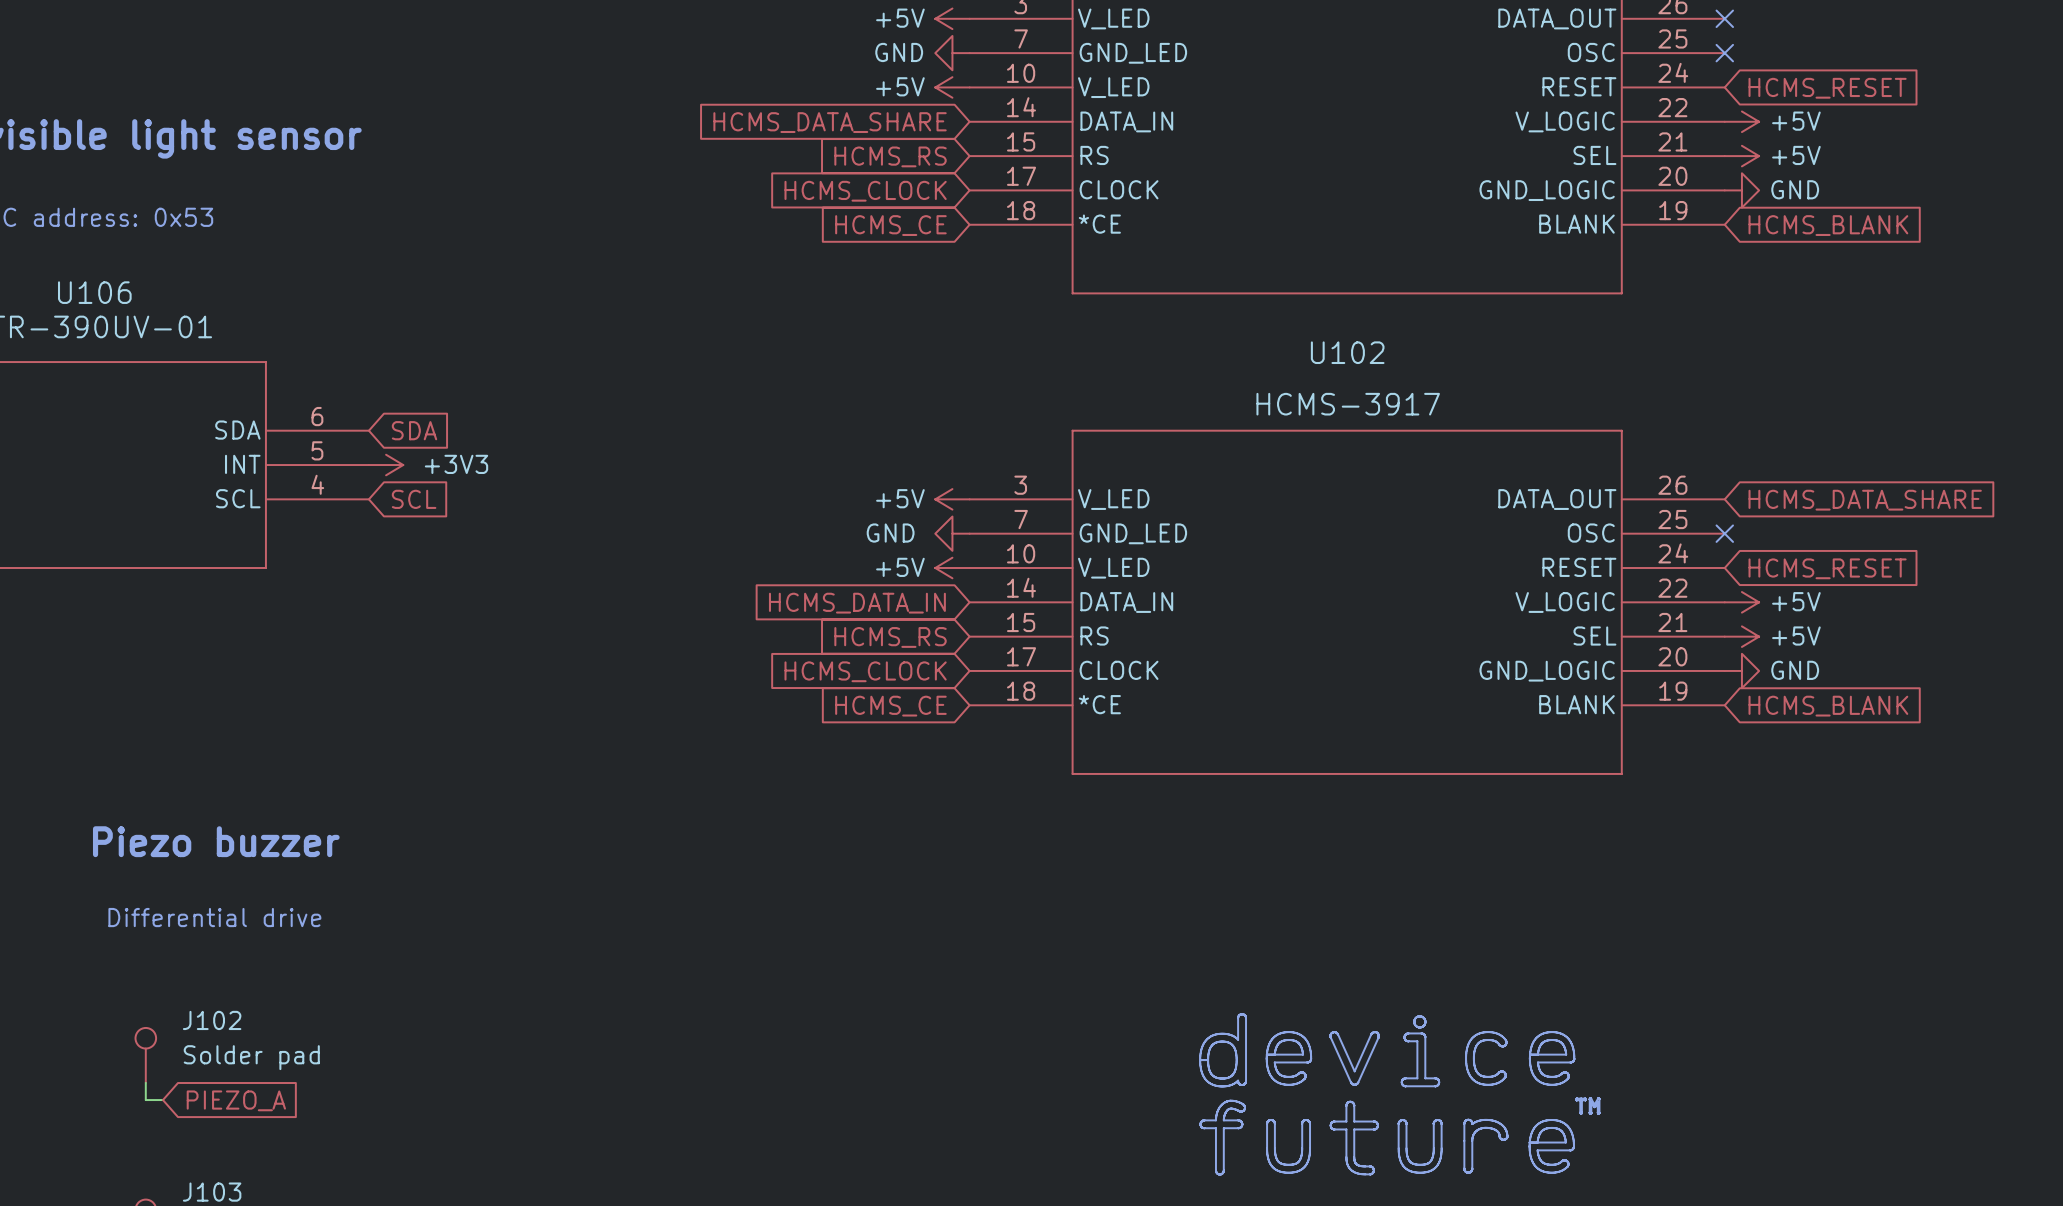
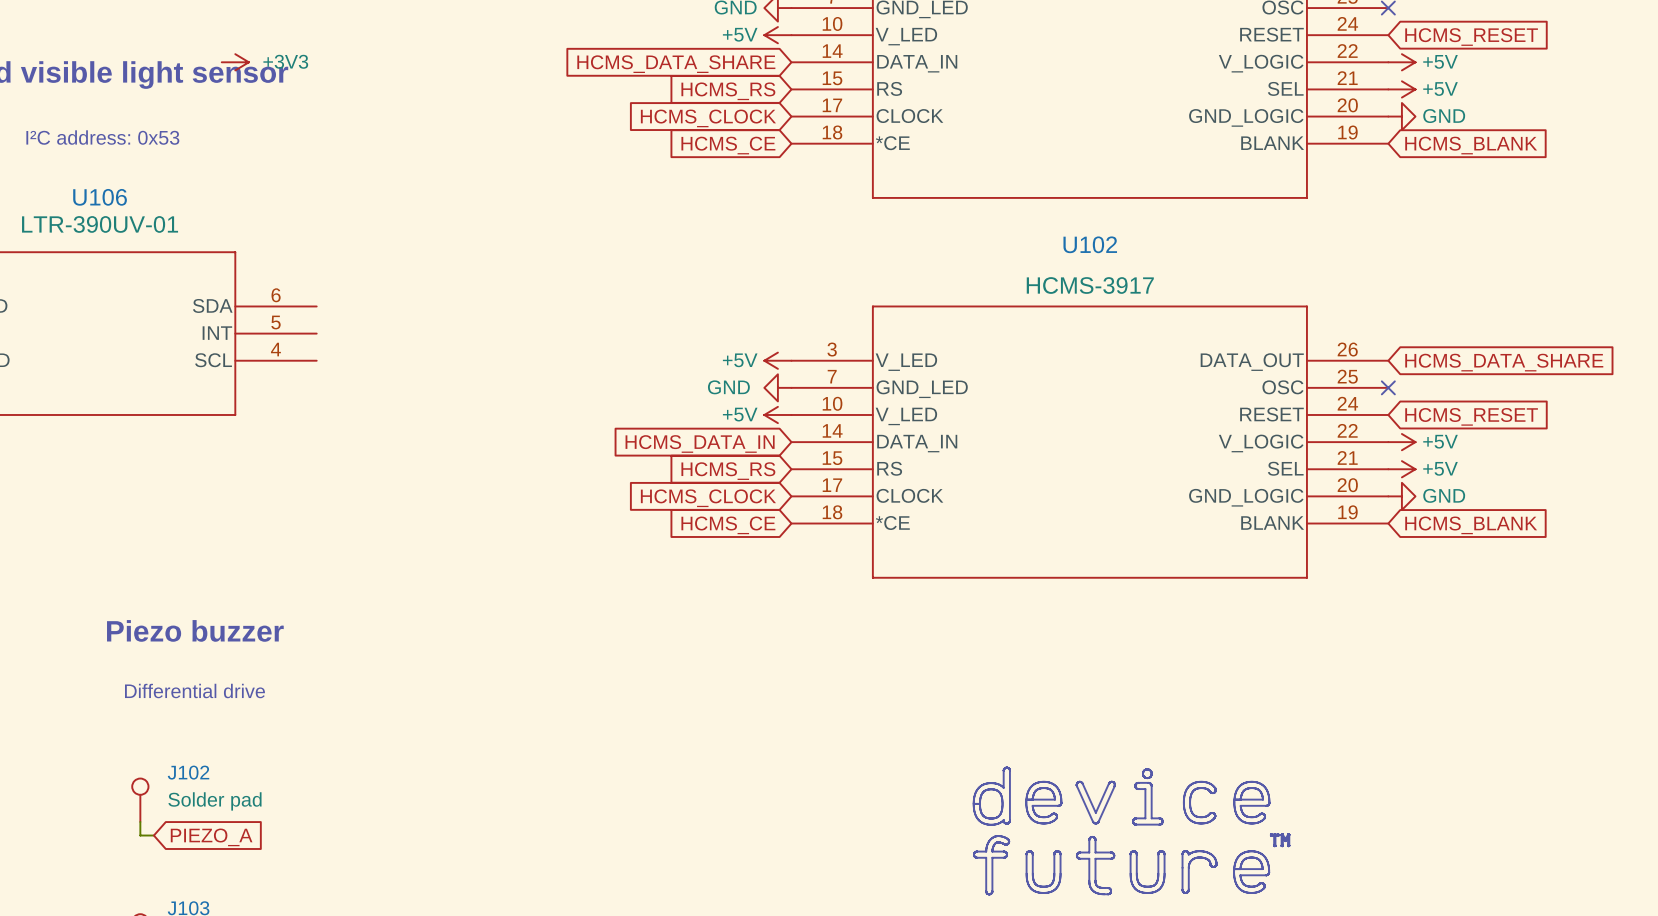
power symbol: none -> +3V3 (235, 62)
global label: SDA (414, 430) -> none
power symbol: +3V3 (386, 465) -> none
global label: SCL (414, 499) -> none

